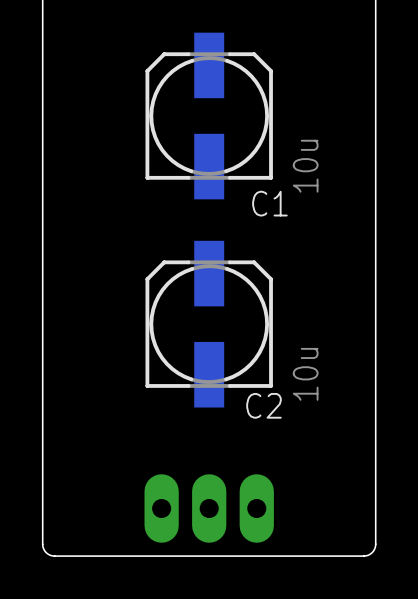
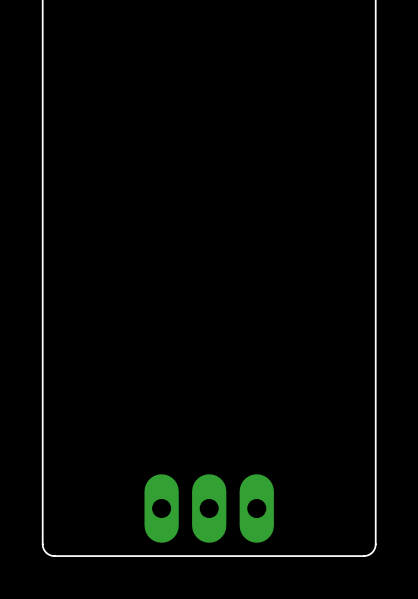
C1: 10u (209, 116) -> none
C2: 10u (209, 324) -> none

